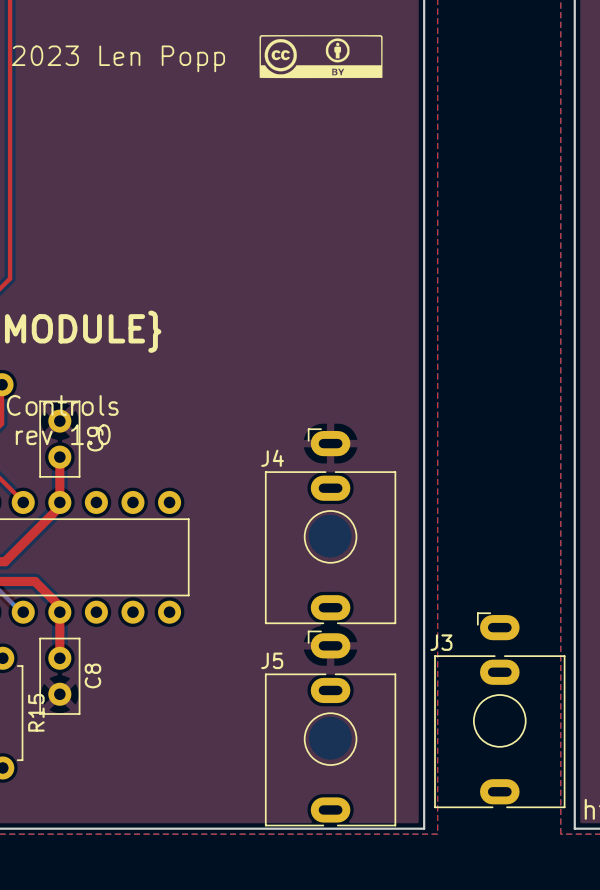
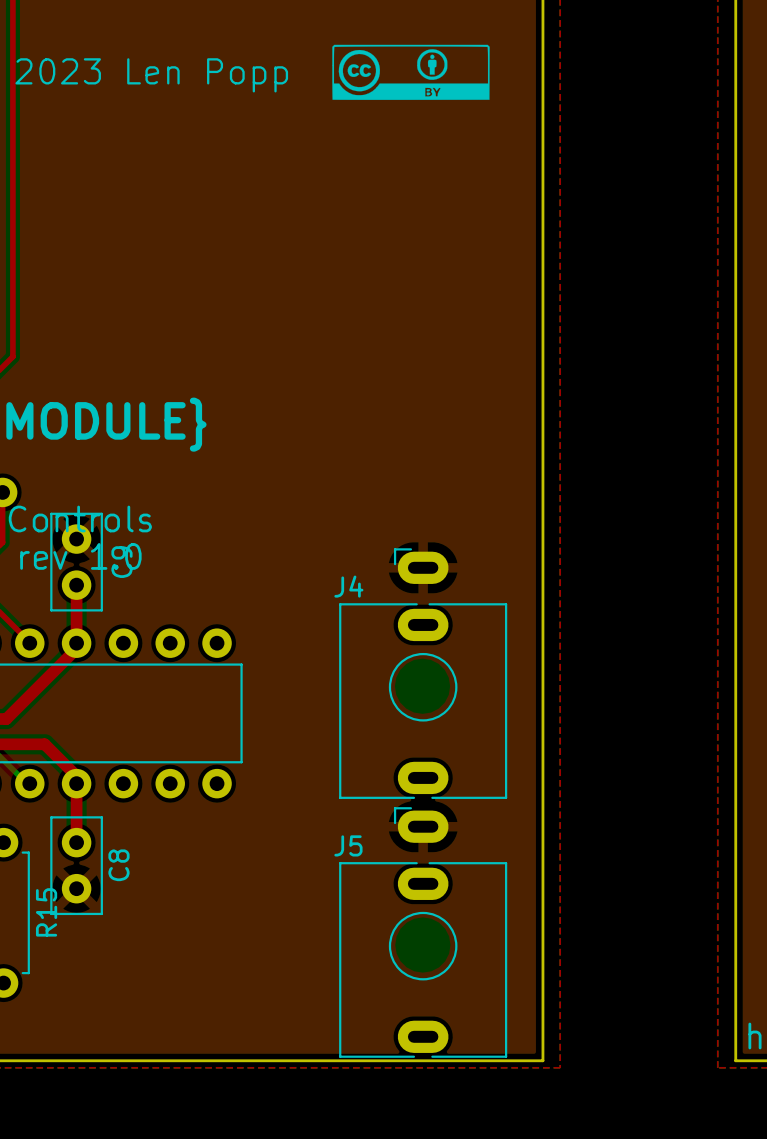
J3: (499, 710) -> none

